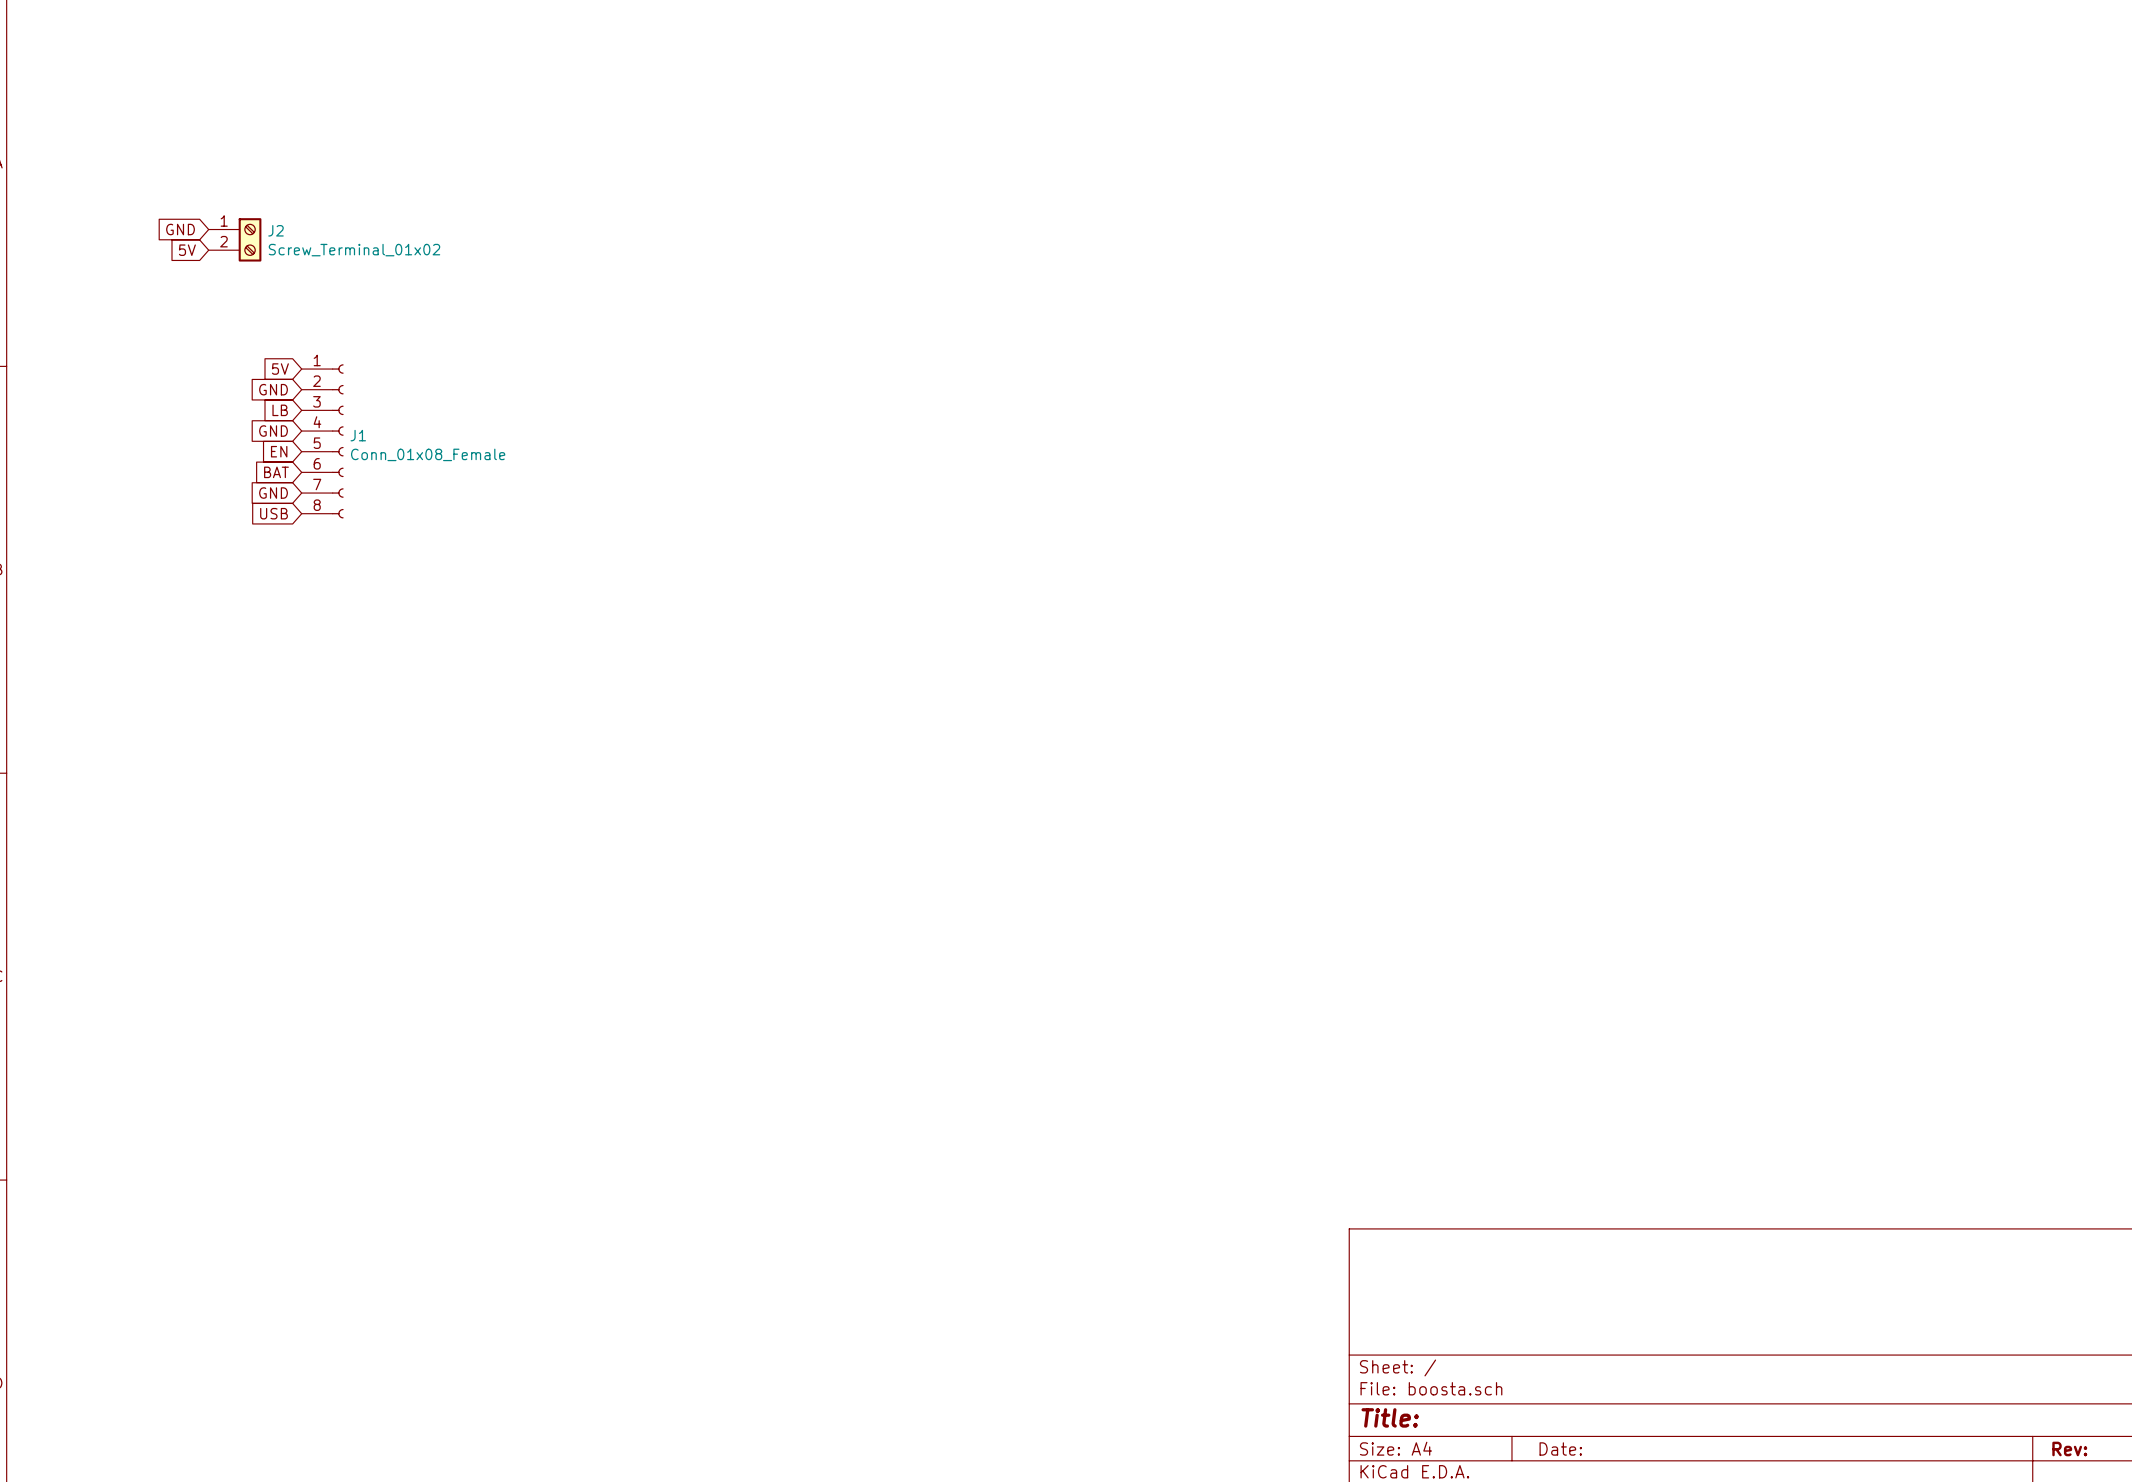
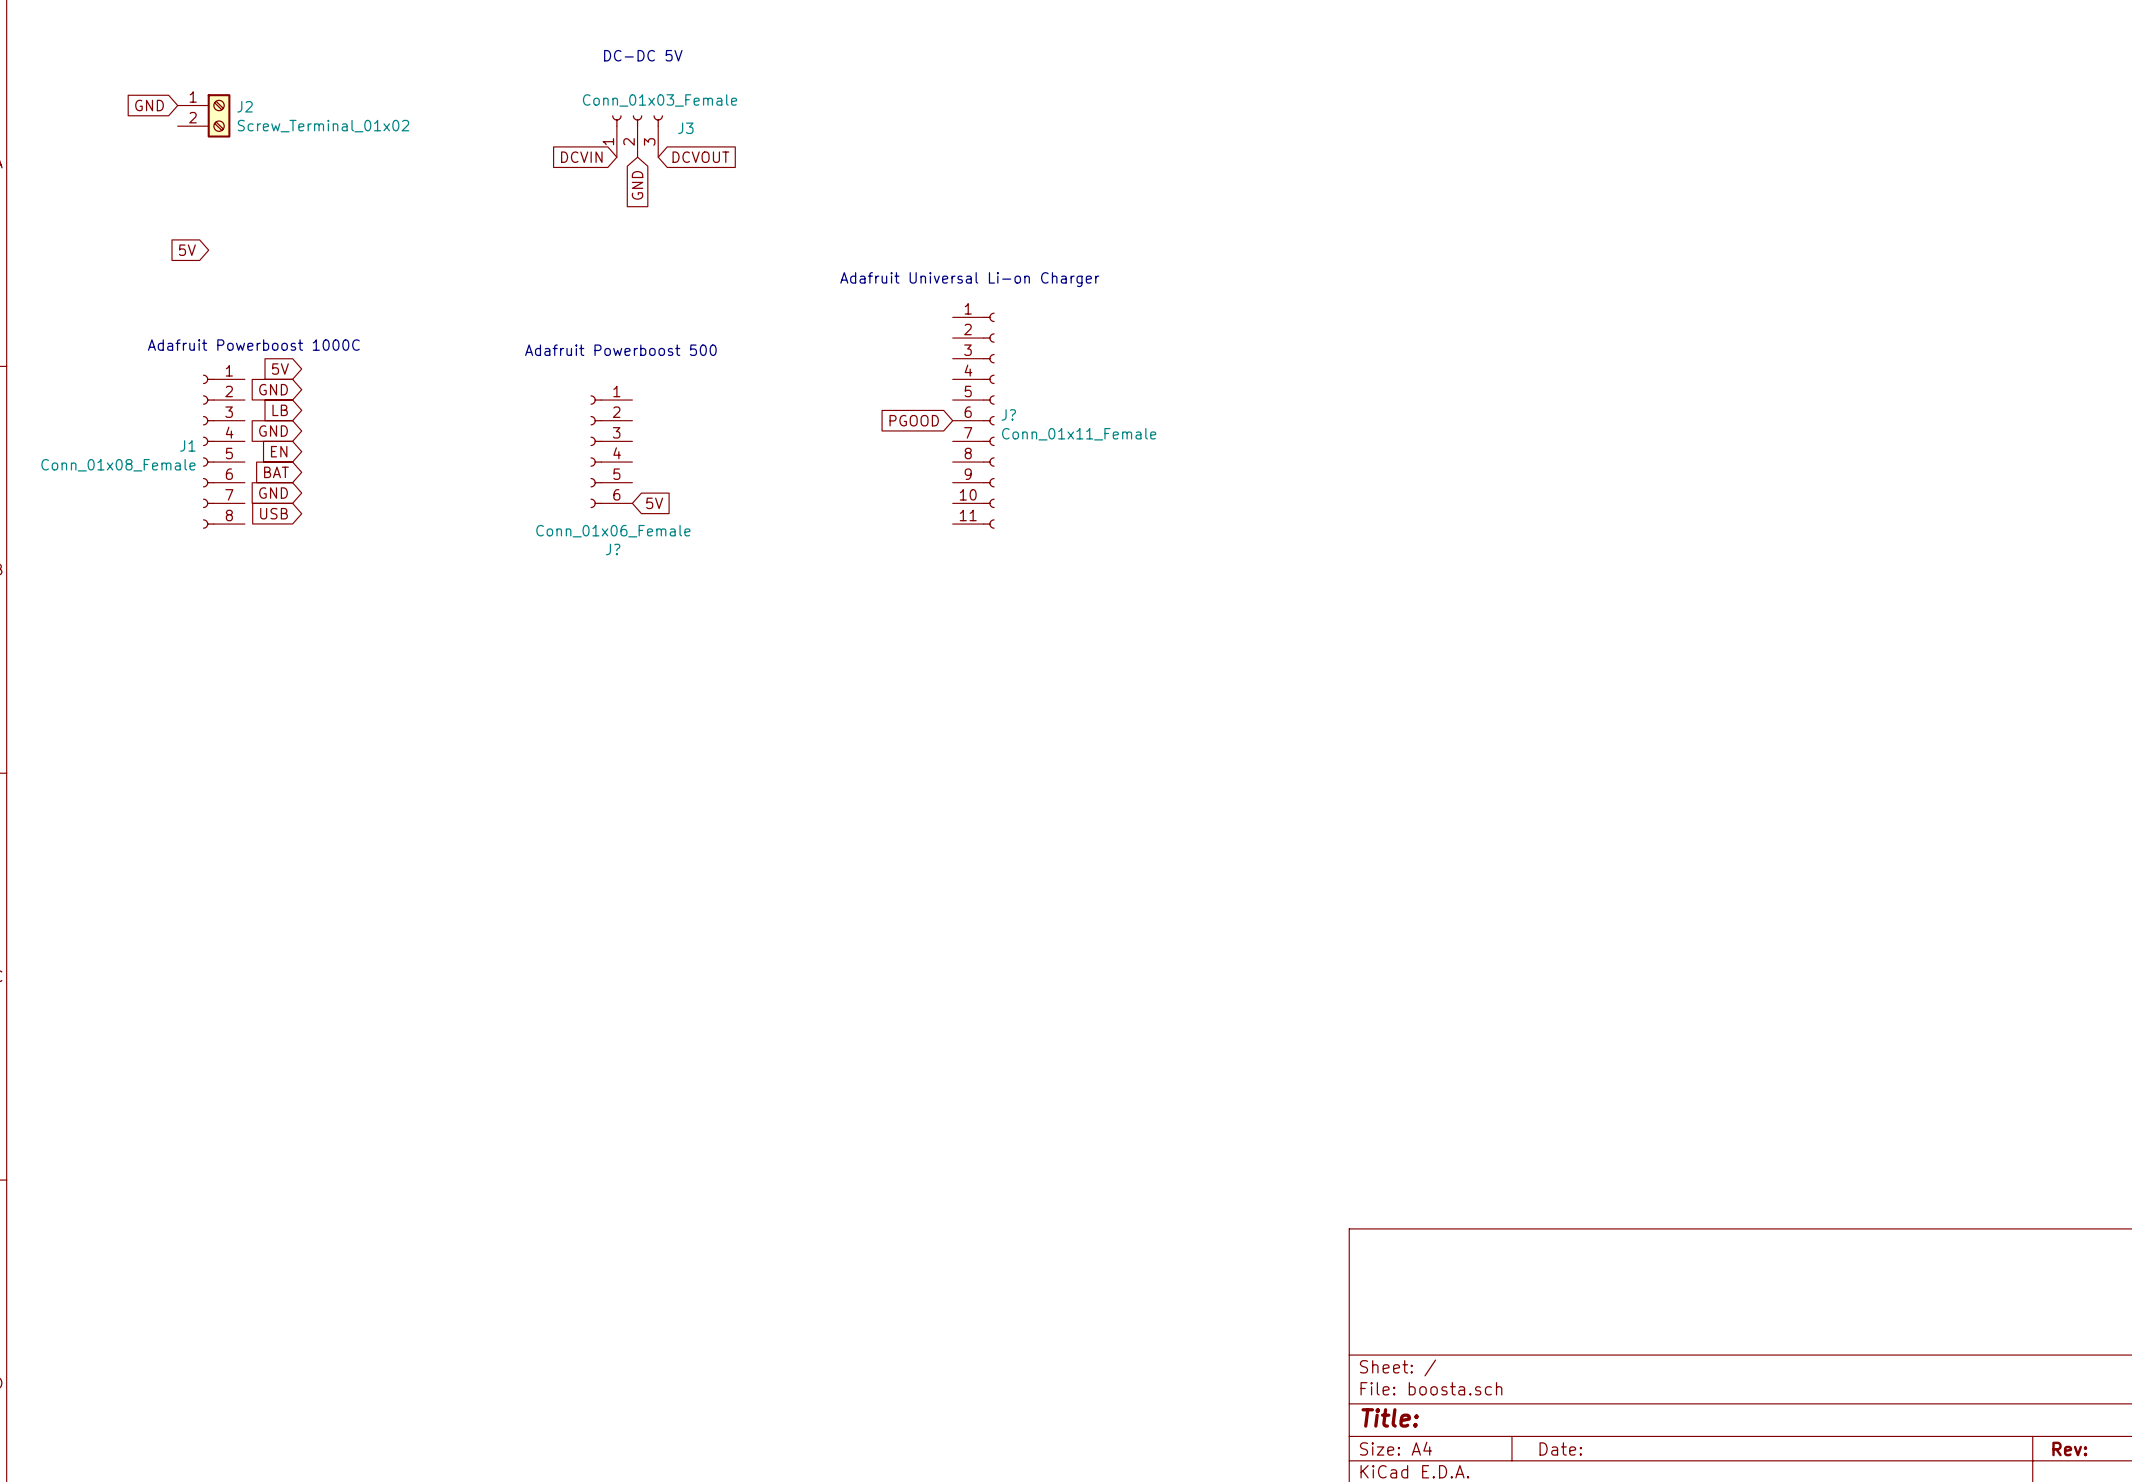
text: none -> DC-DC 5V (643, 55)
J3: none -> Conn_01x03_Female (637, 136)
global label: none -> DCVIN (581, 157)
global label: none -> DCVOUT (700, 157)
global label: none -> GND (637, 185)
global label position: GND (180, 229) -> GND (149, 105)
J2 position: (235, 239) -> (204, 115)
text: none -> Adafruit Universal Li-on Charger (969, 279)
text: none -> Adafruit Powerboost 1000C (253, 345)
text: none -> Adafruit Powerboost 500 (620, 350)
global label: none -> PGOOD (914, 420)
J?: none -> Conn_01x11_Female (973, 420)
J1 position: (322, 441) -> (223, 451)
J1 flip: as is (337, 441) -> left-right (208, 451)
J?: none -> Conn_01x06_Female (611, 451)
global label: none -> 5V (654, 503)

